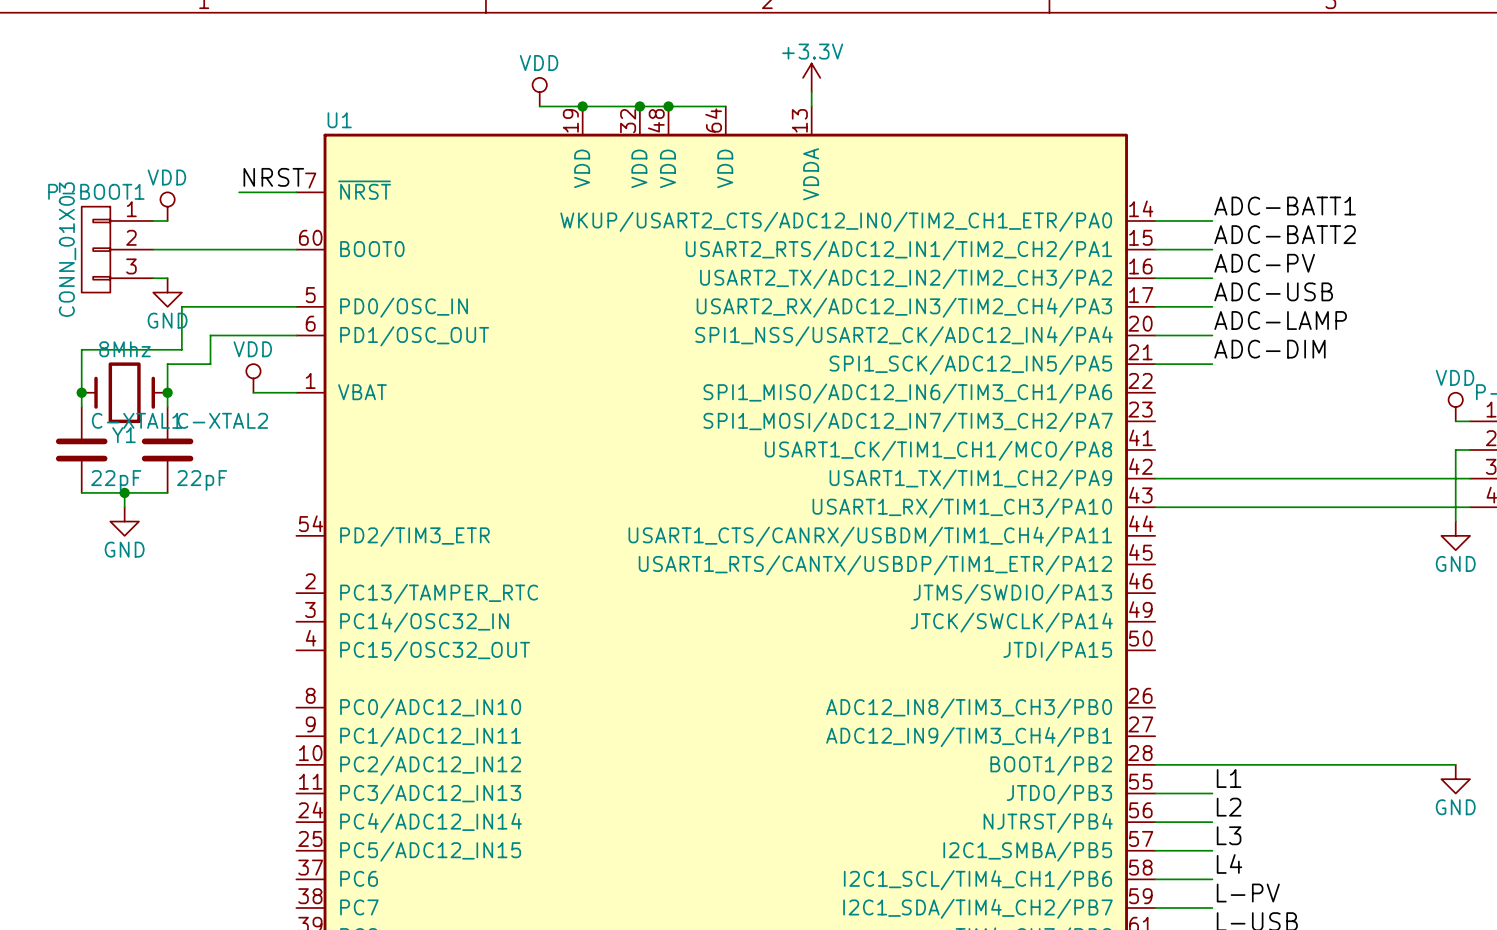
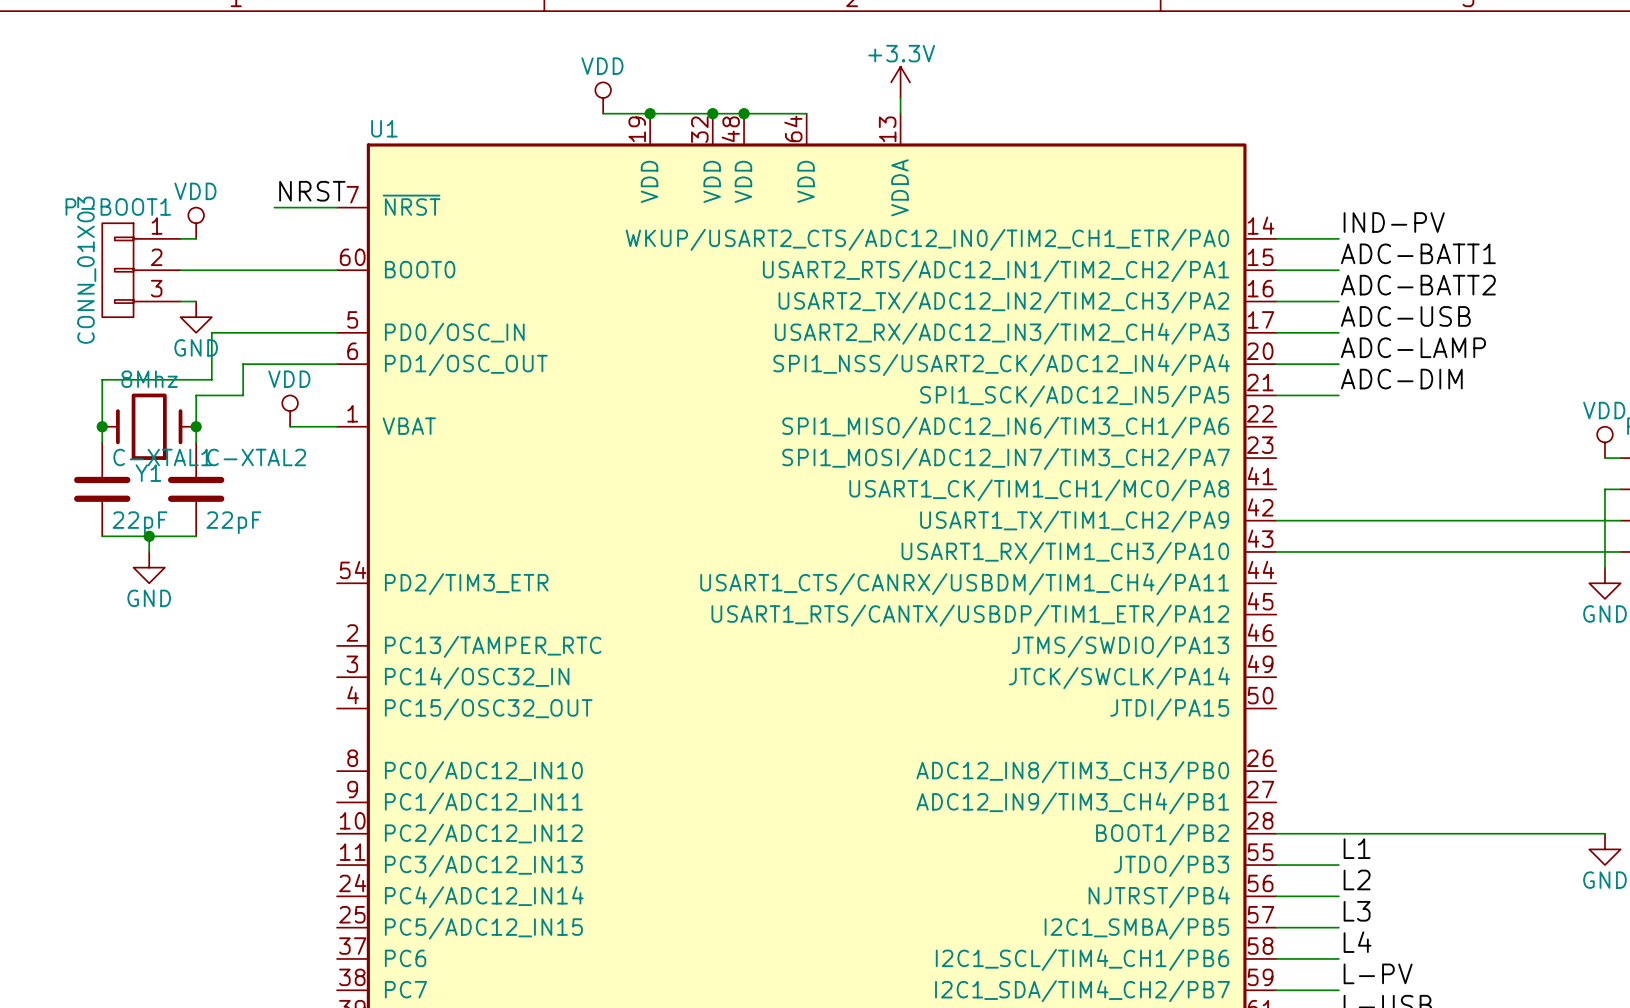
label: ADC-BATT1 (1285, 206) -> IND-PV (1394, 222)
label: ADC-BATT2 (1285, 234) -> ADC-BATT1 (1418, 253)
label: ADC-PV (1264, 263) -> ADC-BATT2 (1418, 285)

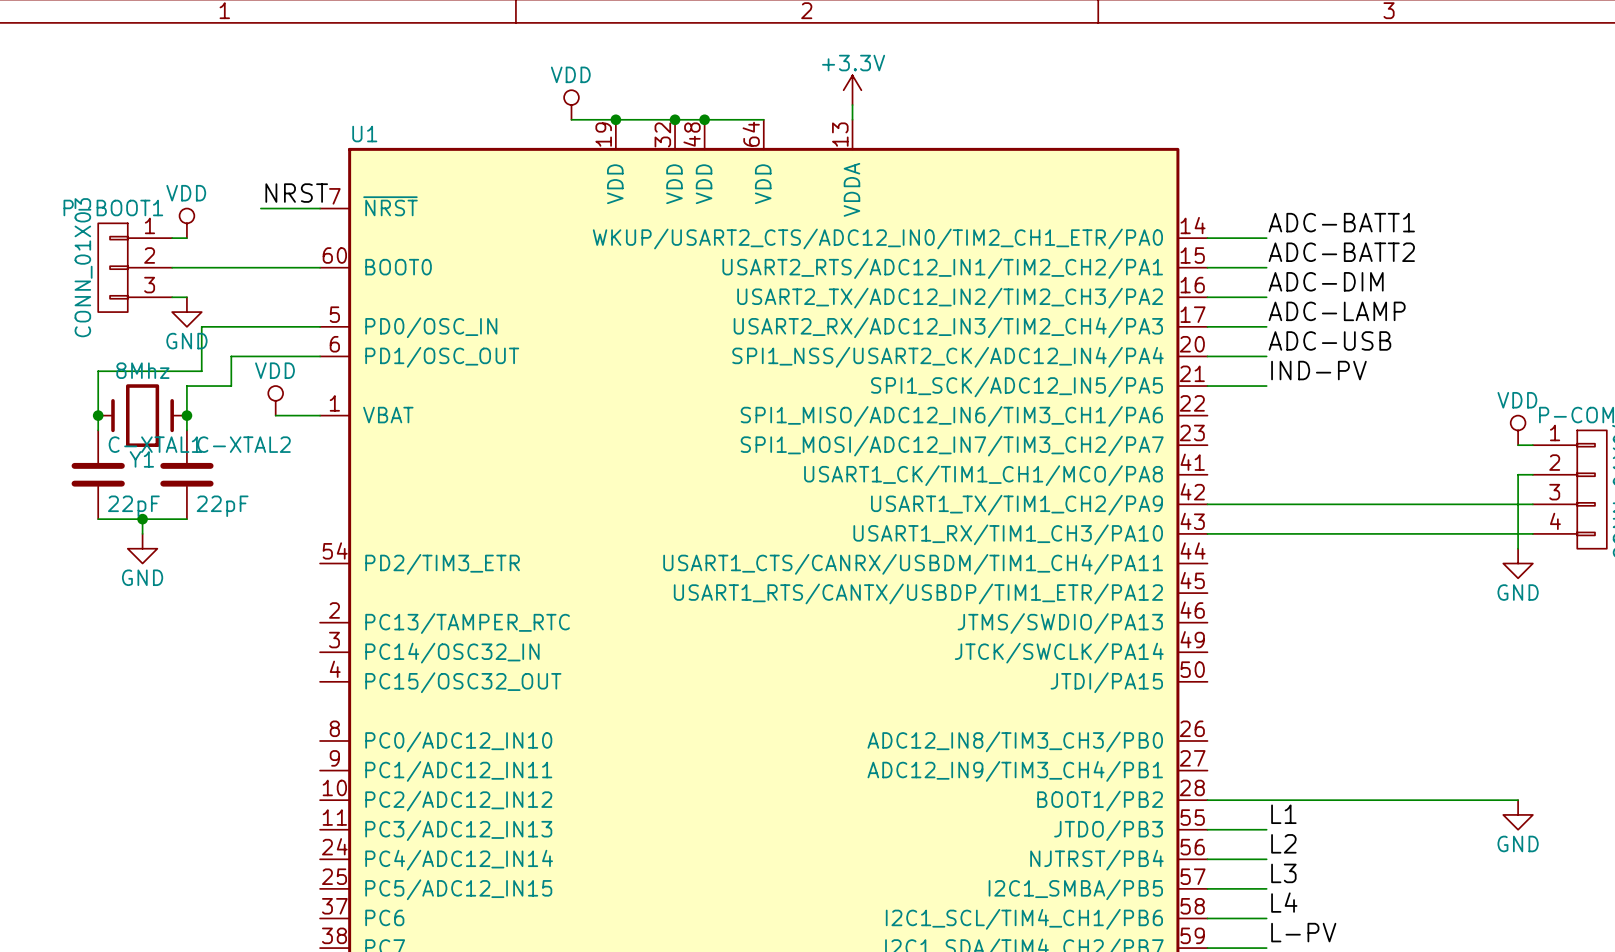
label: IND-PV (1394, 222) -> ADC-BATT1 (1341, 222)
label: ADC-BATT1 (1418, 253) -> ADC-BATT2 (1341, 252)
label: ADC-BATT2 (1418, 285) -> ADC-DIM (1326, 281)
label: ADC-USB (1405, 316) -> ADC-LAMP (1337, 311)
label: ADC-LAMP (1413, 347) -> ADC-USB (1329, 340)
label: ADC-DIM (1401, 379) -> IND-PV (1318, 370)

